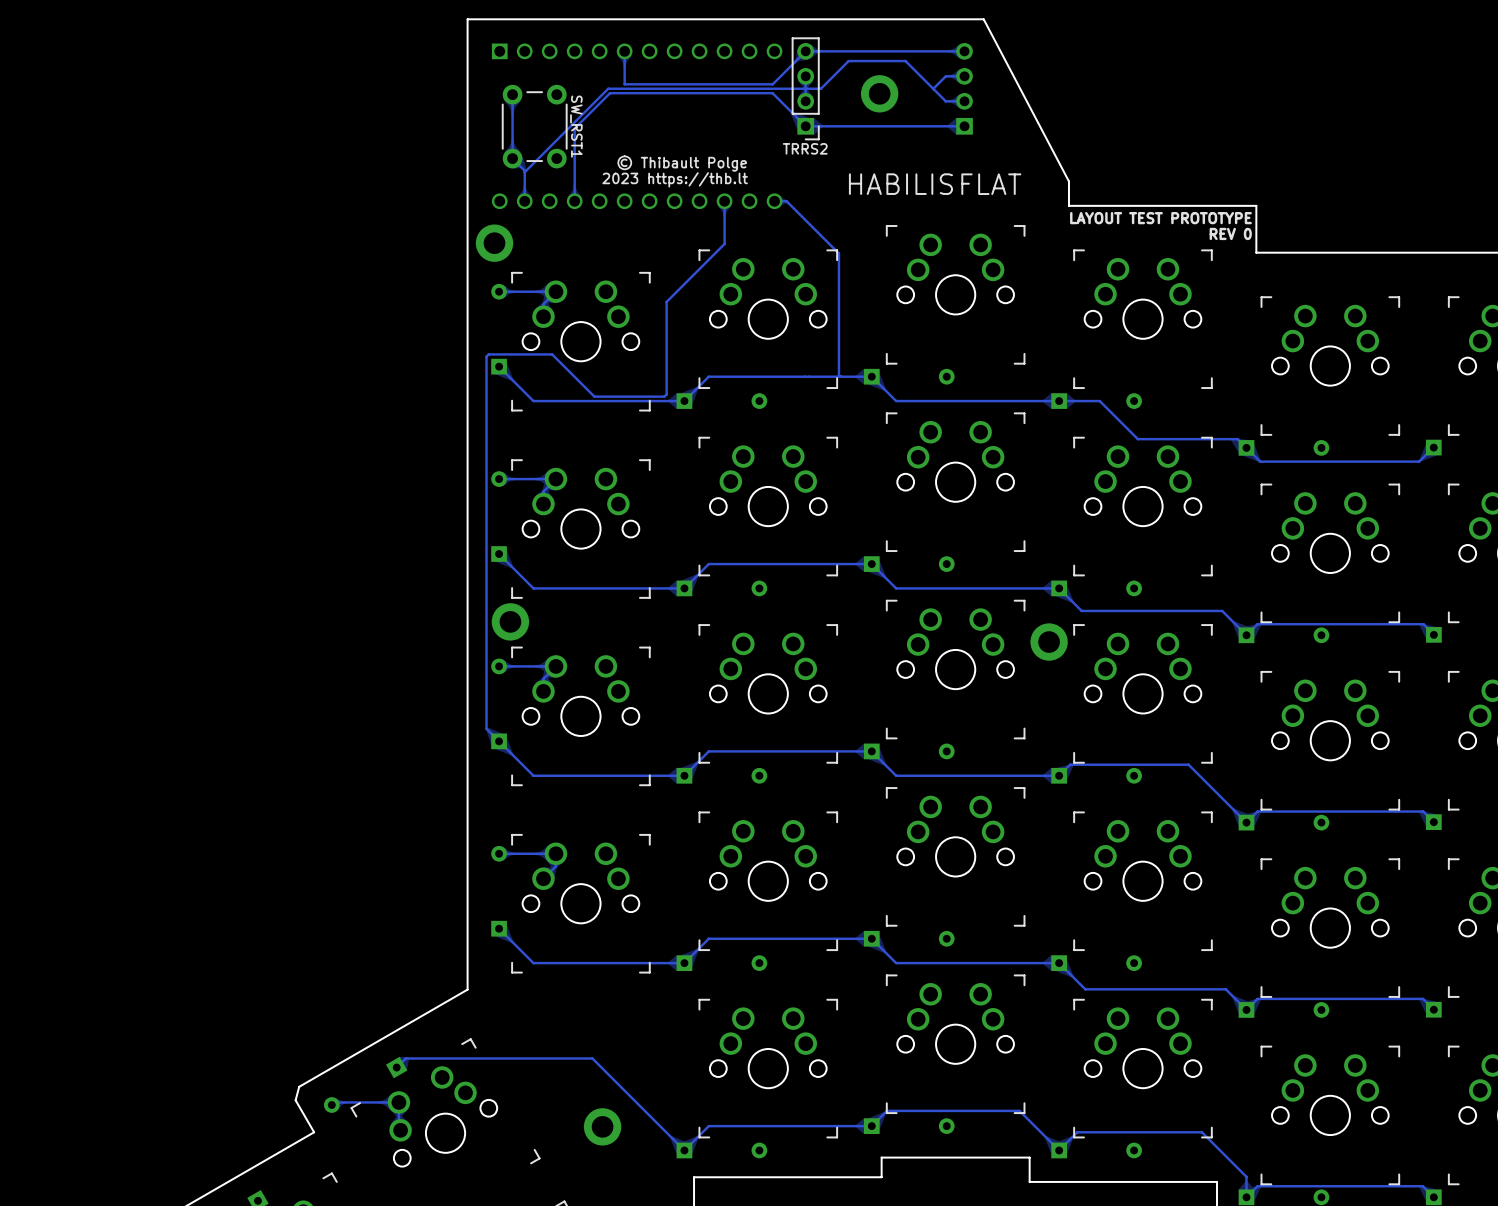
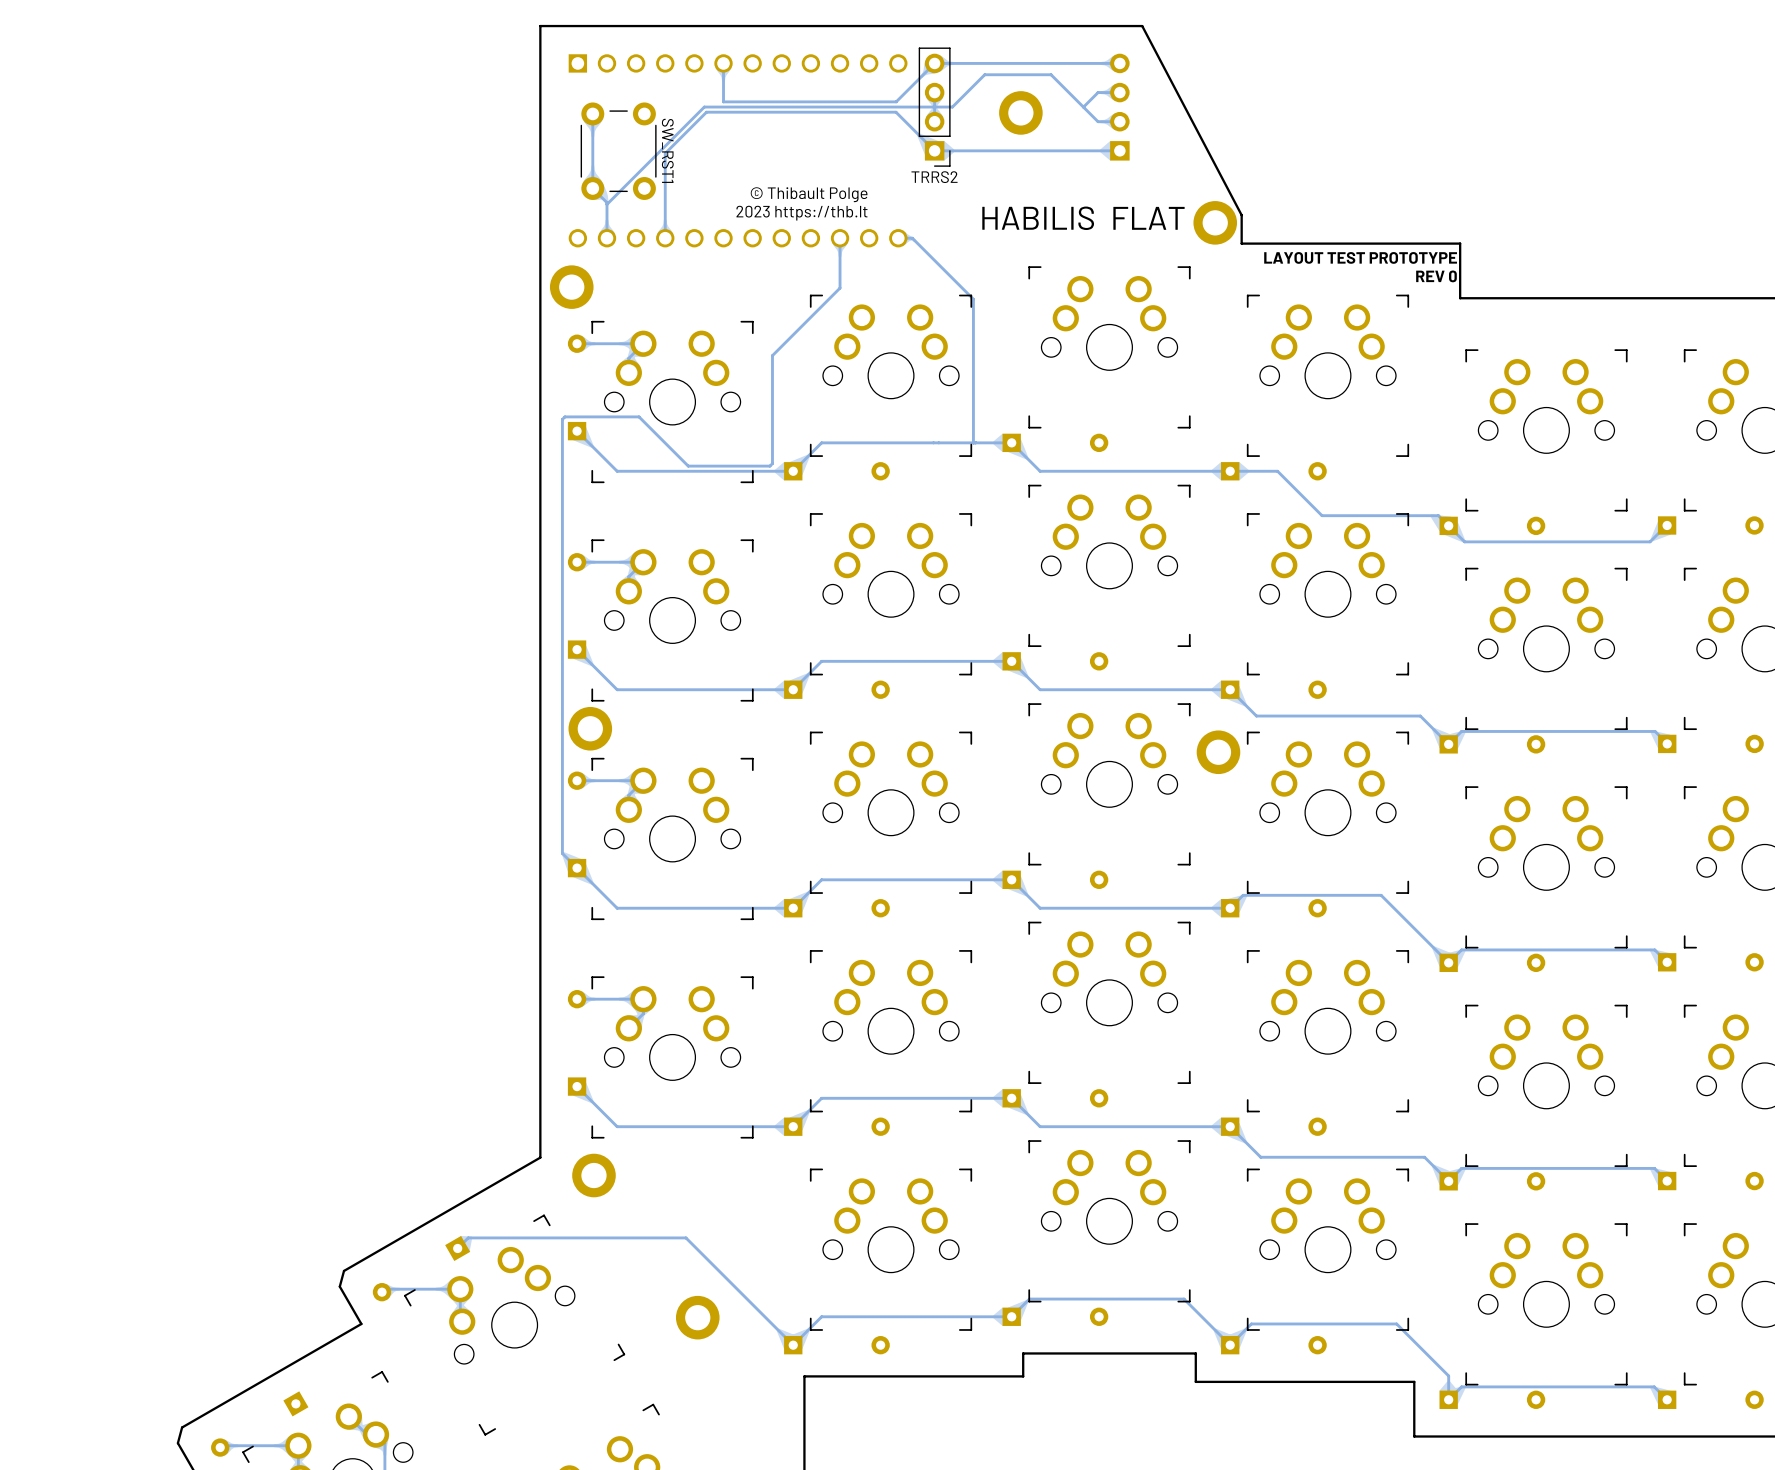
part: none -> (1215, 222)
part: none -> (593, 1175)

